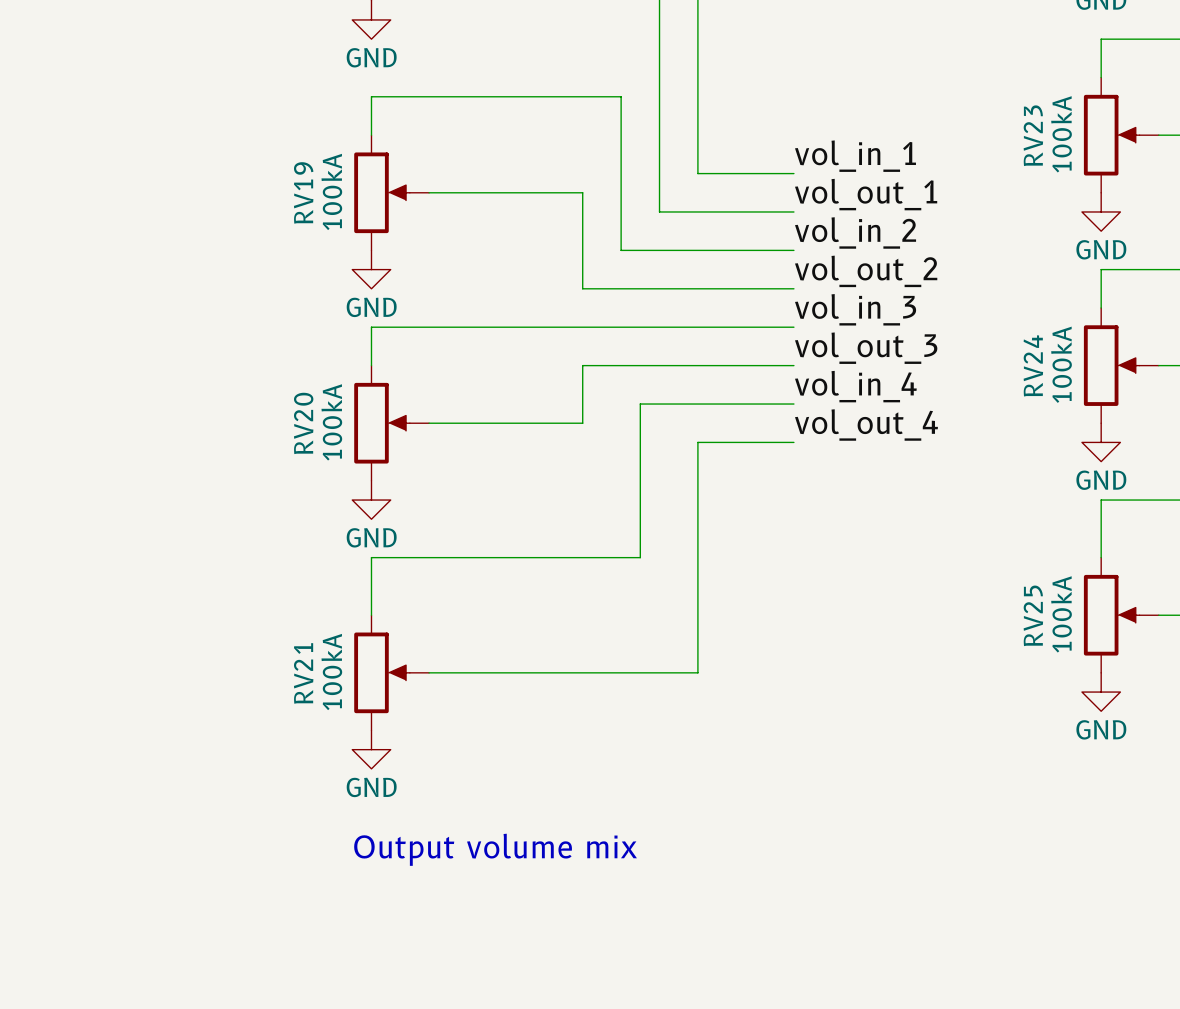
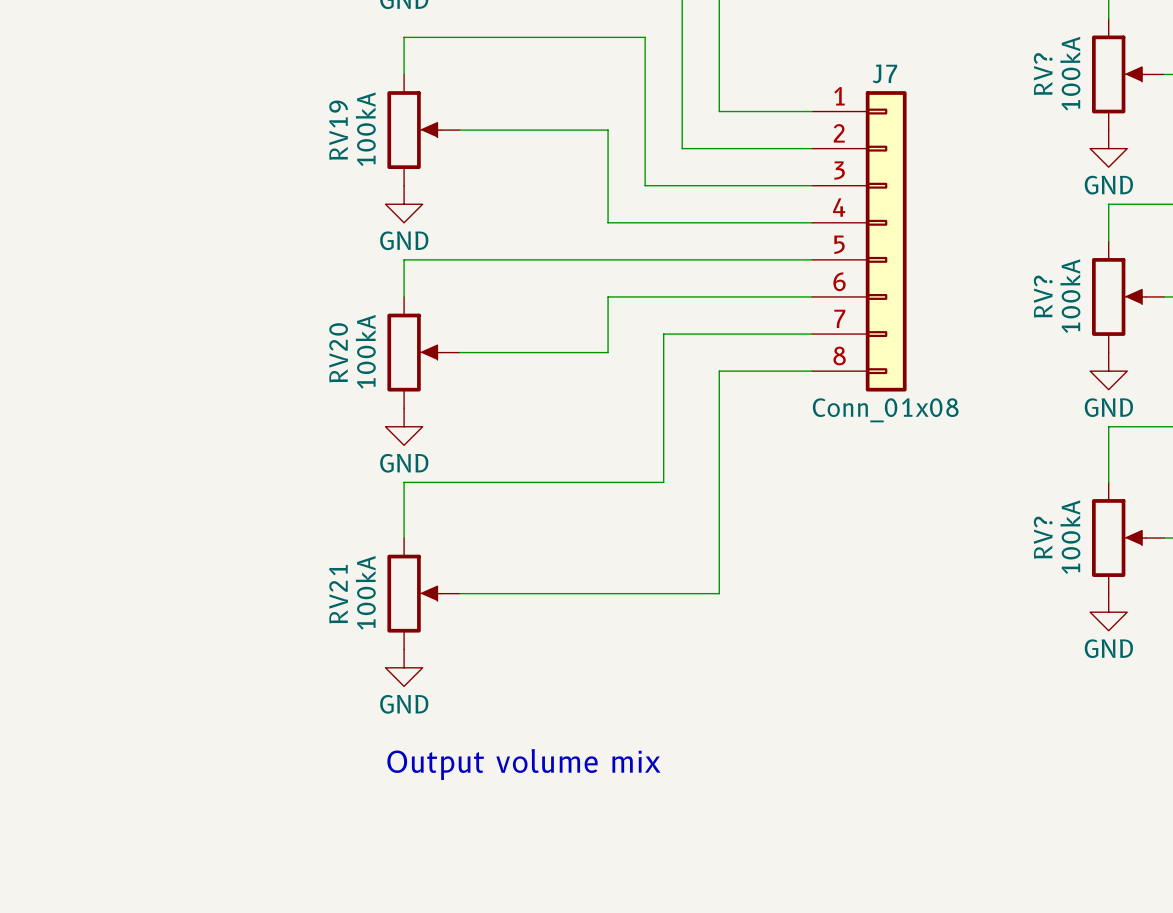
RV23 name: RV23 (1033, 135) -> RV? (1043, 74)
label: vol_in_1 (855, 156) -> none
label: vol_out_1 (866, 194) -> none
label: vol_in_2 (855, 232) -> none
label: vol_out_2 (866, 271) -> none
J7: none -> Conn_01x08 (859, 241)
label: vol_in_3 (855, 309) -> none
label: vol_out_3 (866, 348) -> none
RV24 name: RV24 (1033, 365) -> RV? (1043, 296)
label: vol_in_4 (855, 386) -> none
label: vol_out_4 (866, 425) -> none
RV25 name: RV25 (1033, 615) -> RV? (1043, 537)

